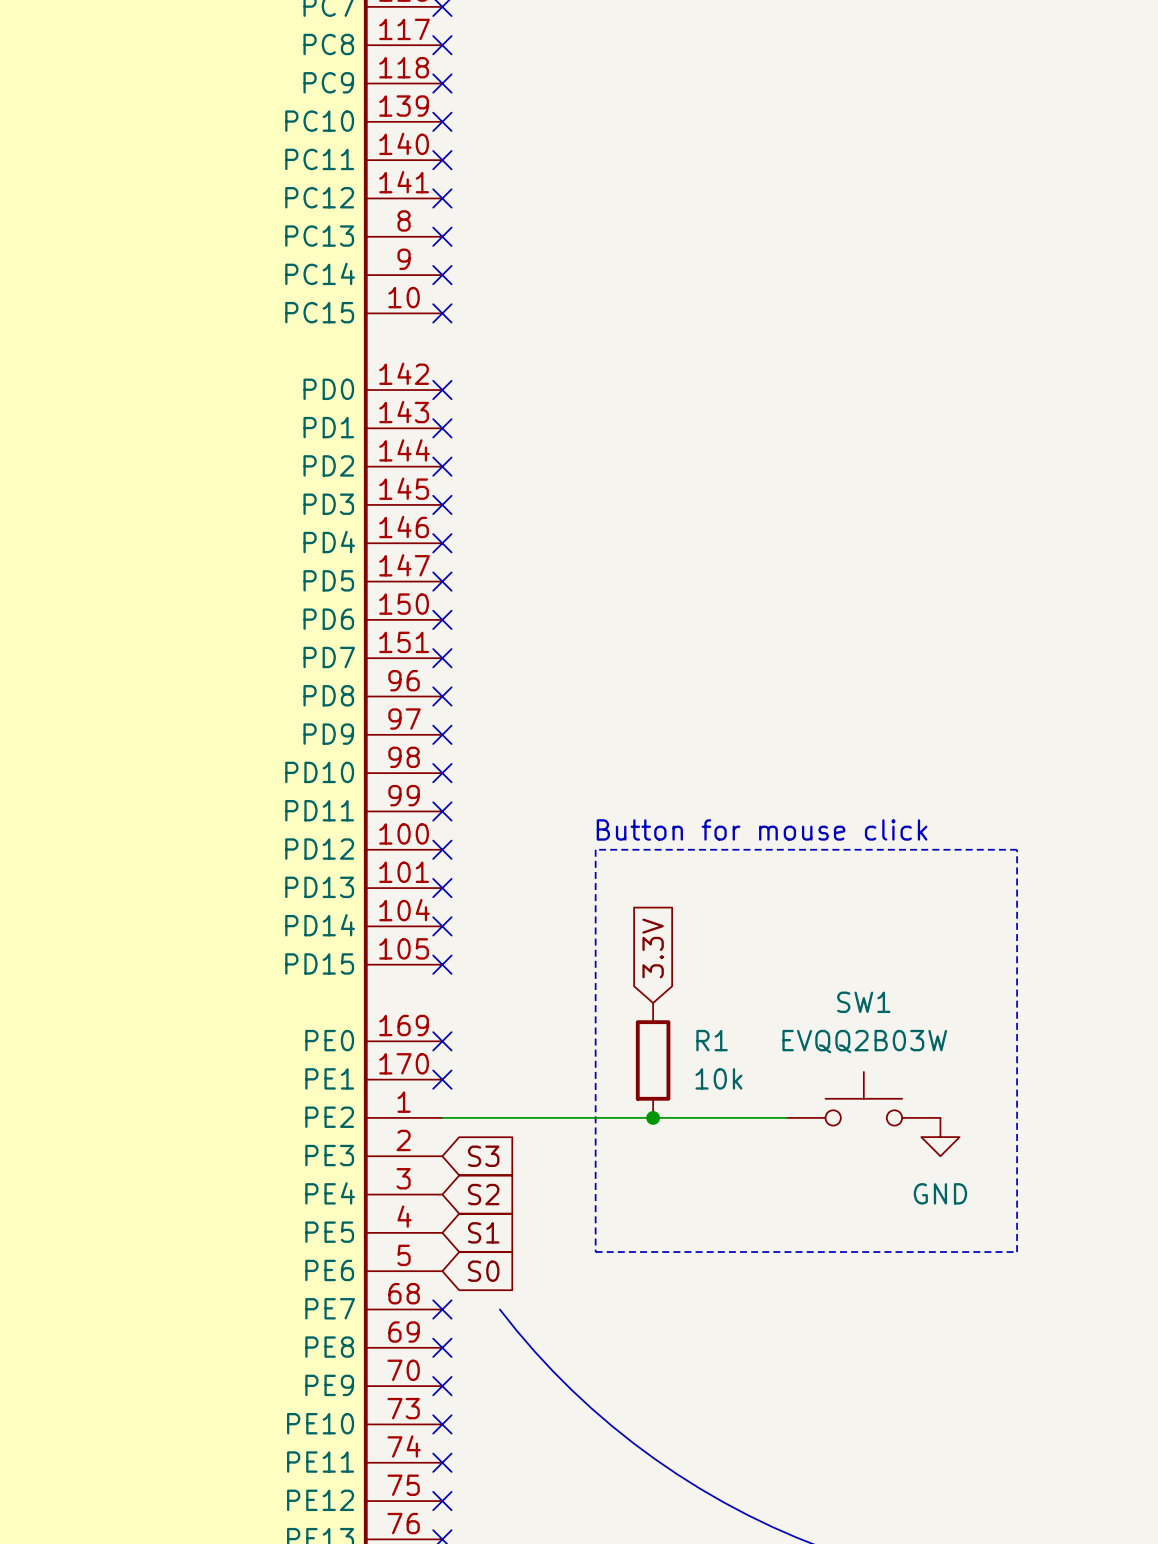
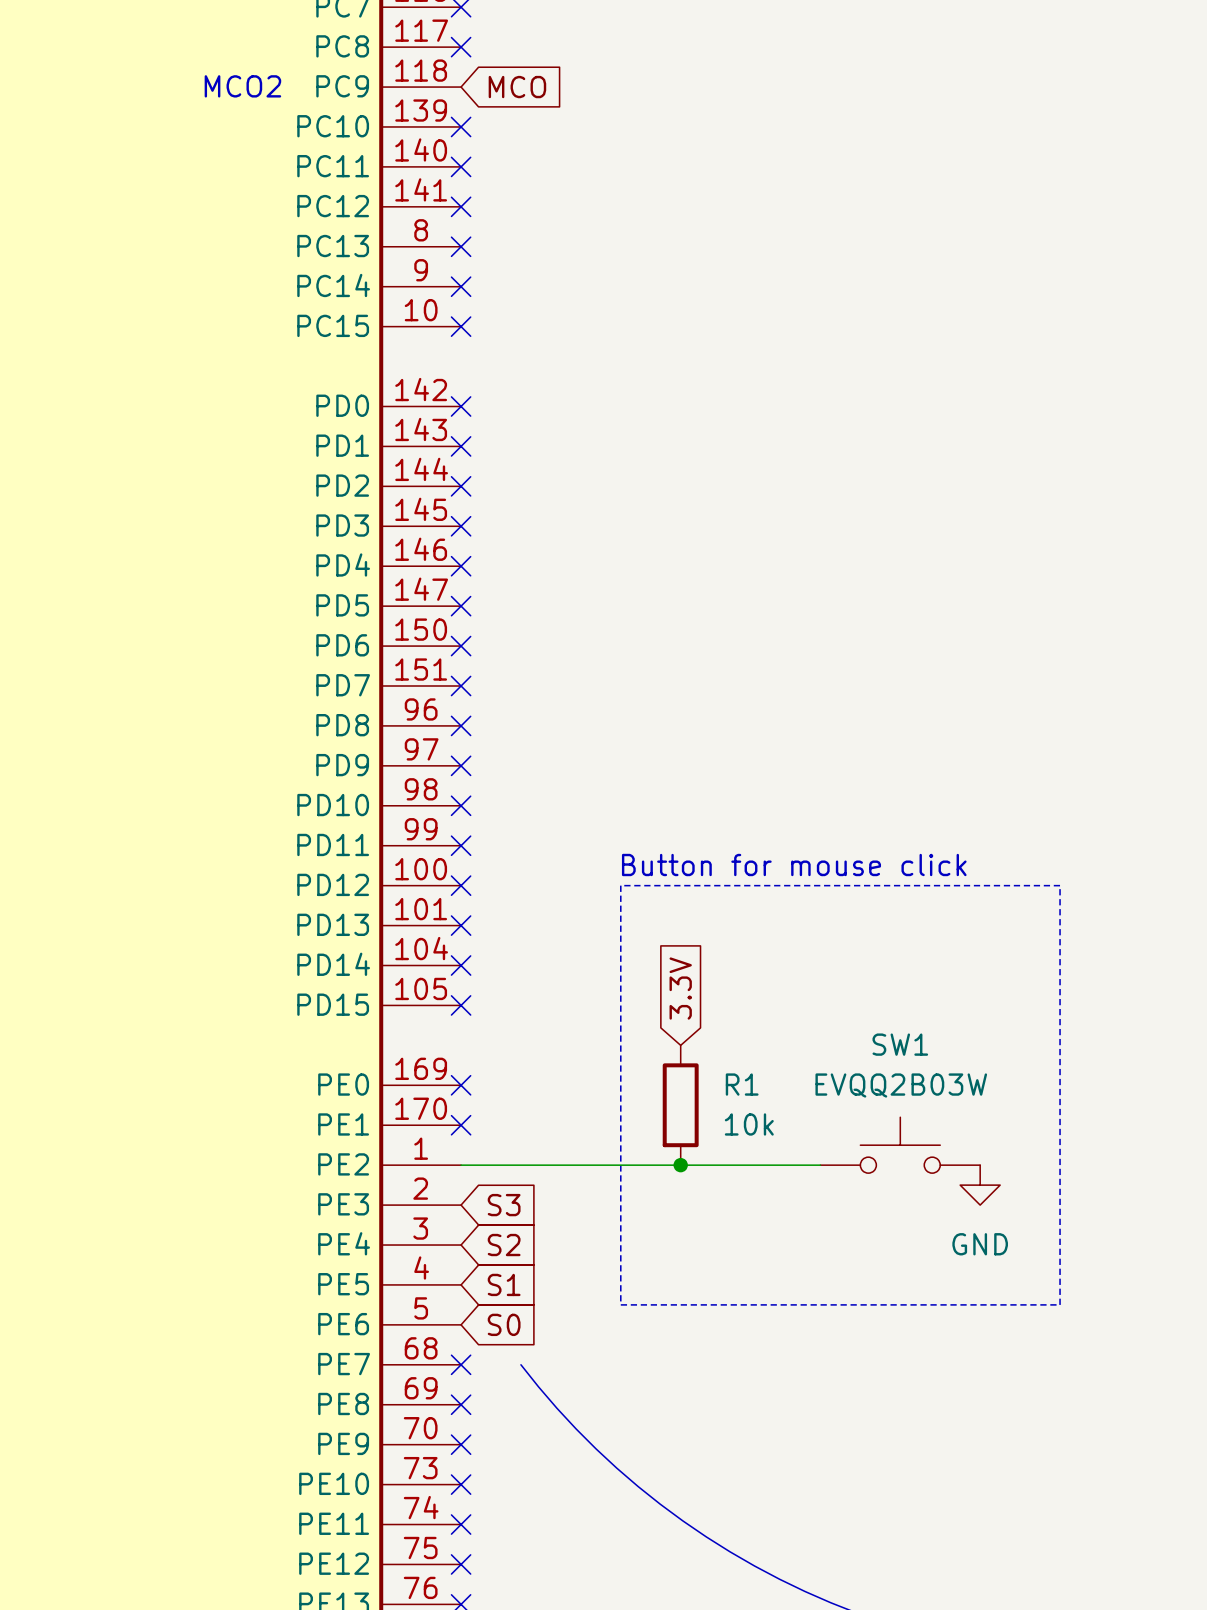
text: none -> MCO2 (242, 86)
no-connect mark: (442, 83) -> none
global label: none -> MCO (517, 87)

